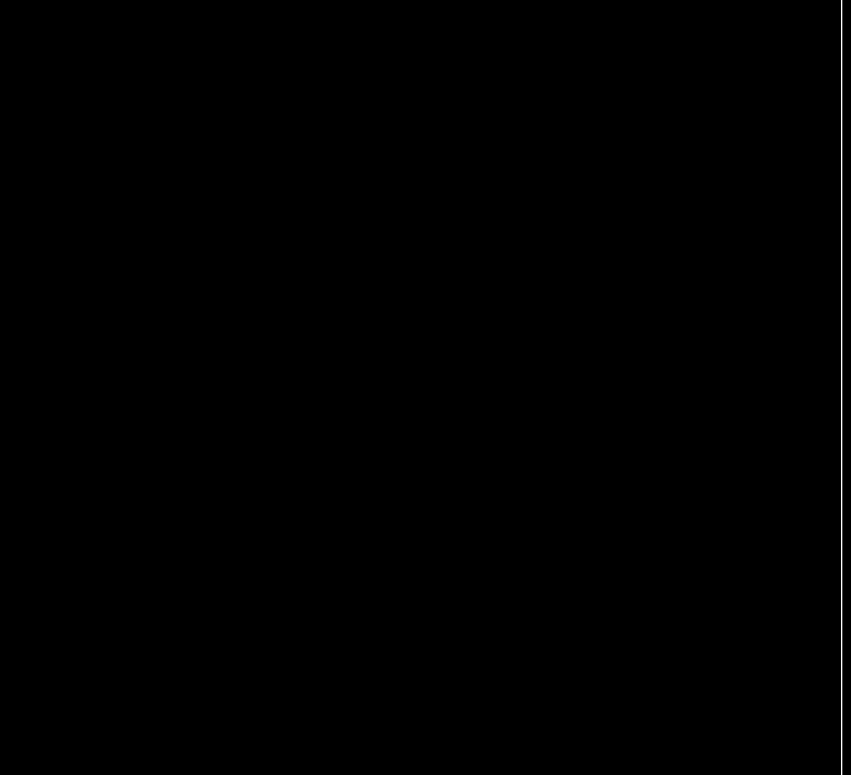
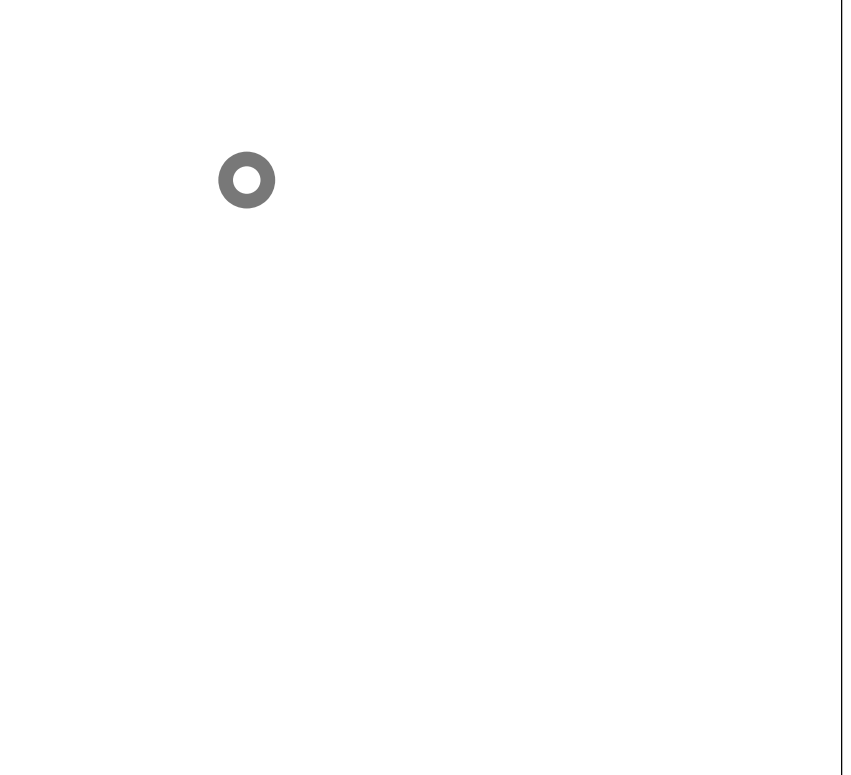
via: none -> (246, 180)

